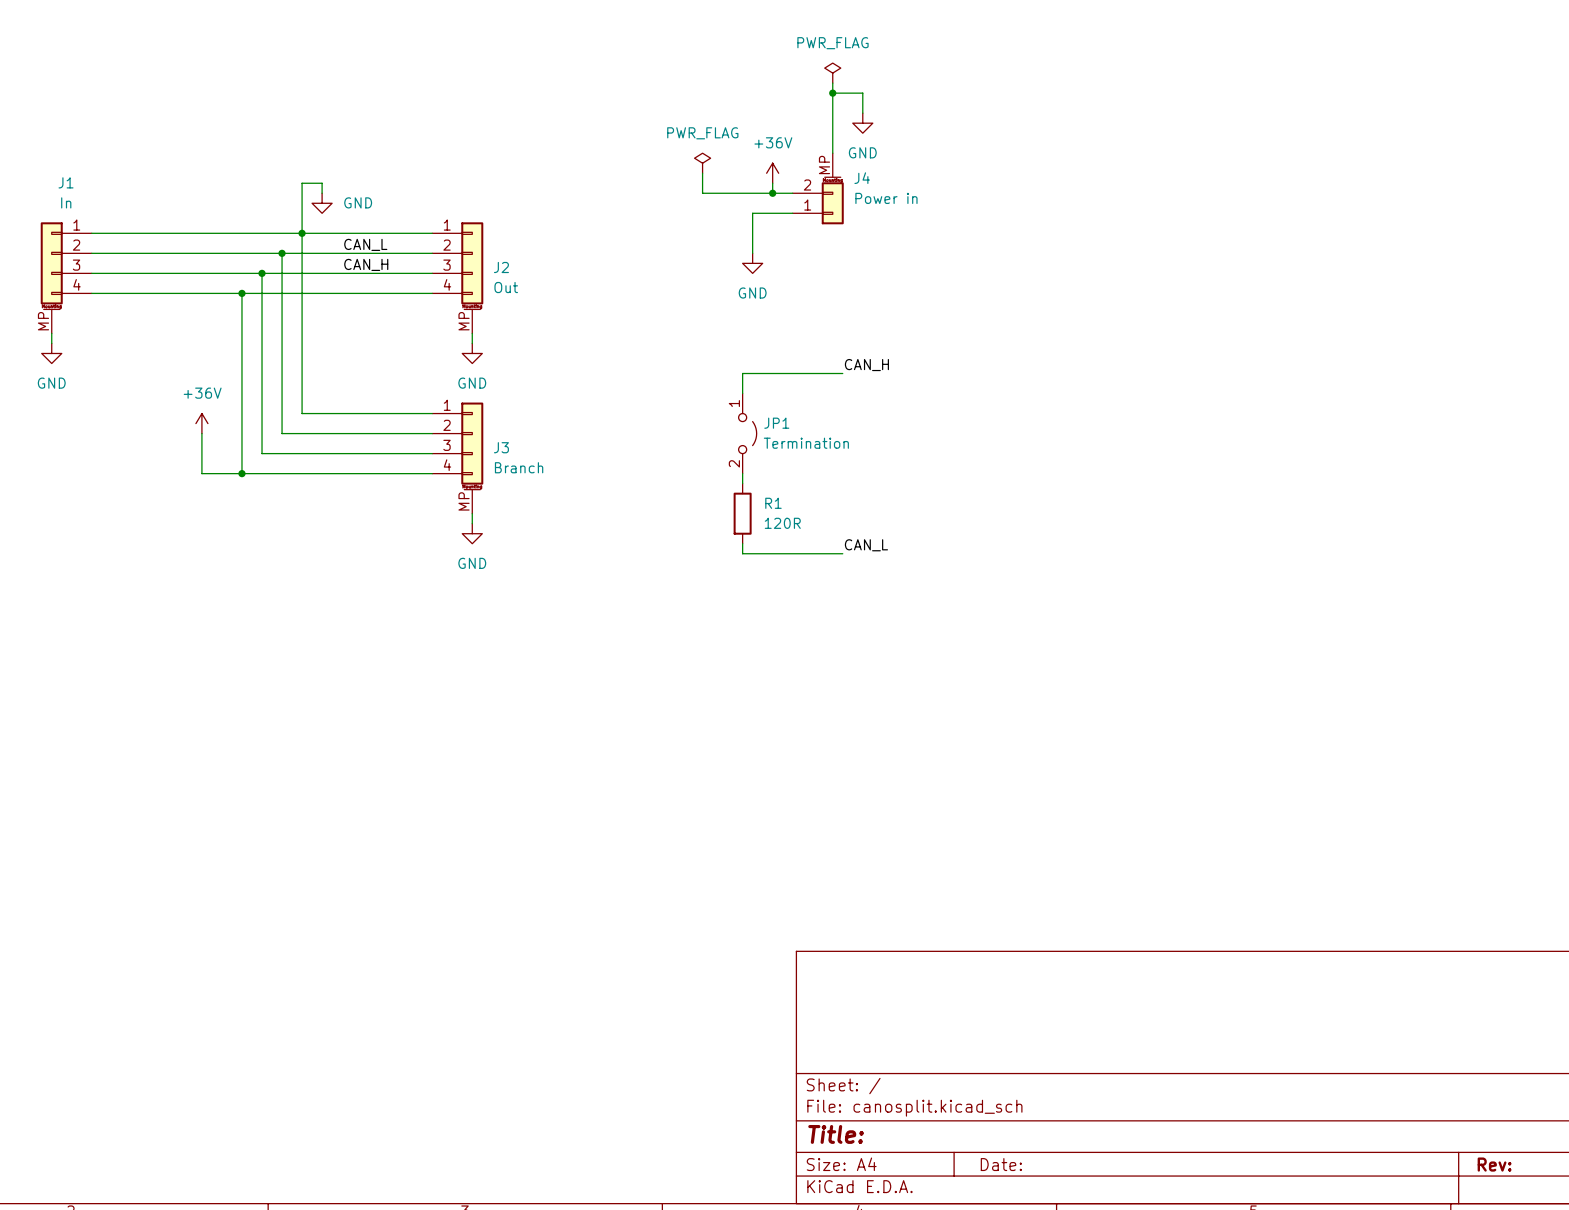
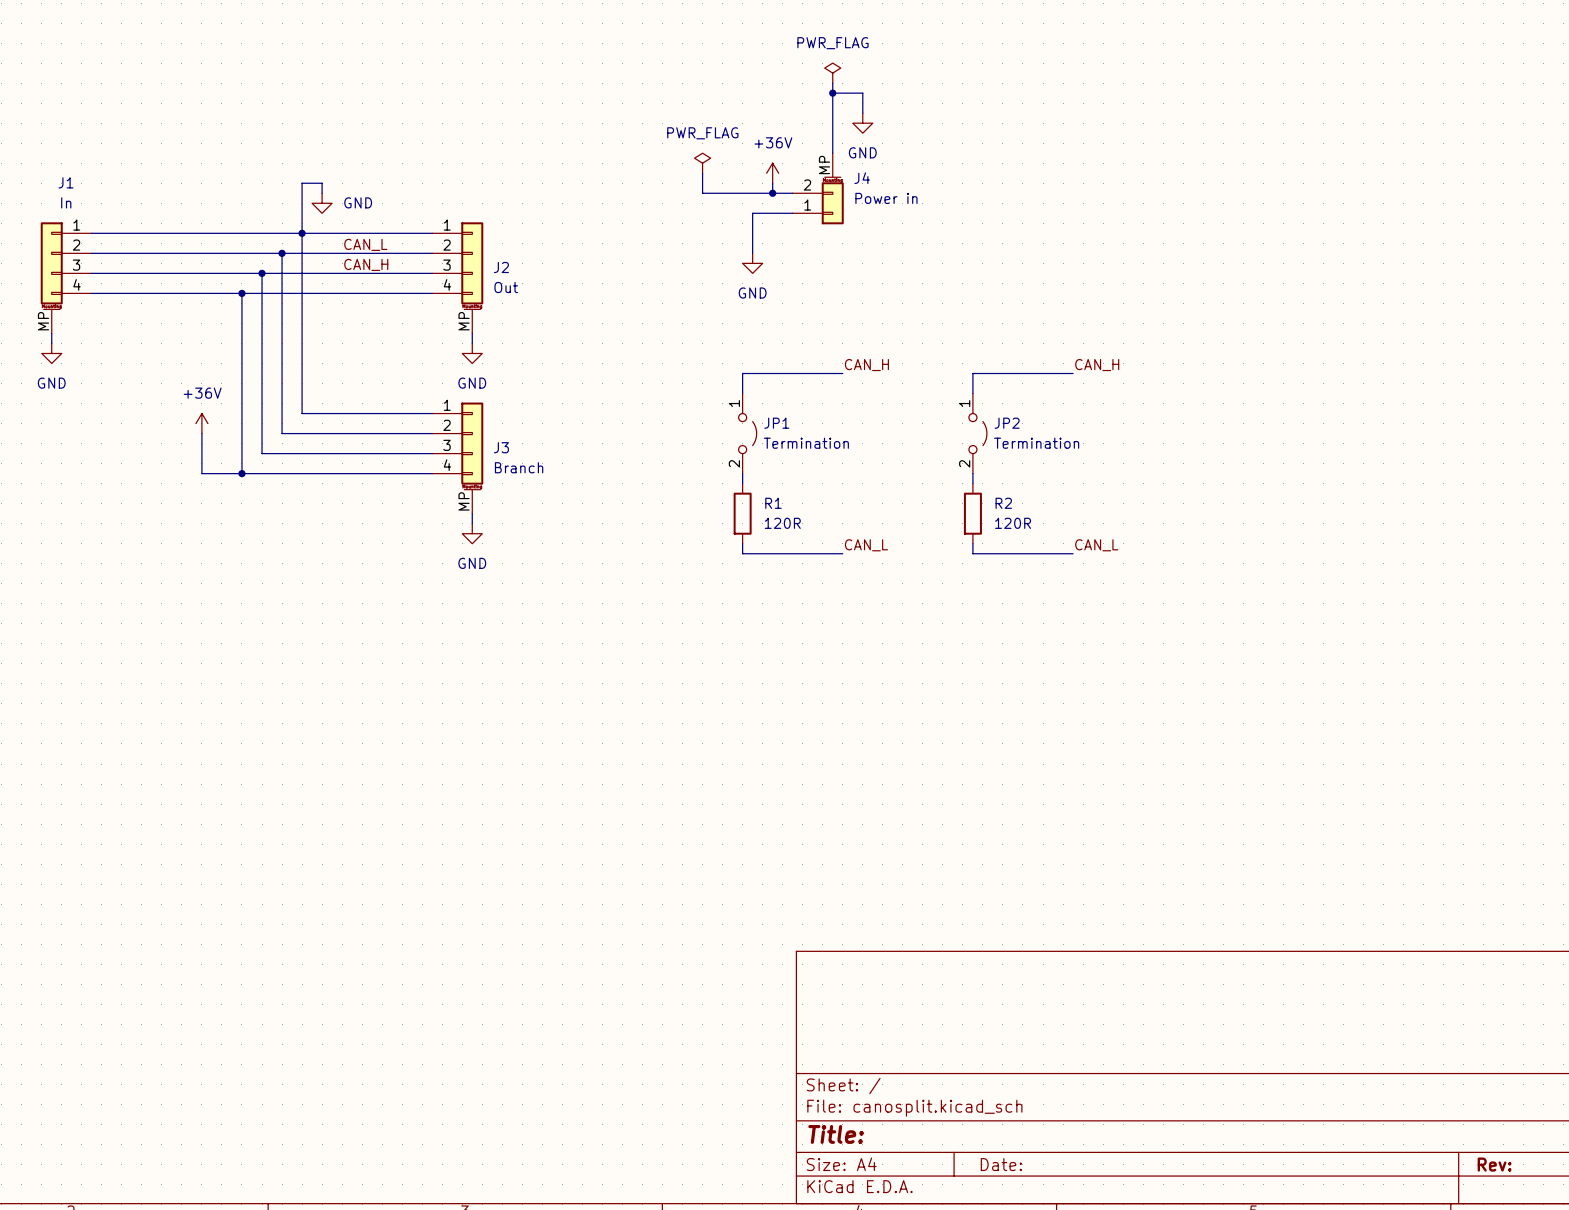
label: none -> CAN_H (1097, 365)
wire: none -> (1073, 373) (972, 373) (972, 393)
JP2: none -> Termination (977, 433)
wire: none -> (972, 473) (972, 483)
R2: none -> 120R (972, 513)
wire: none -> (972, 543) (972, 553) (1073, 553)
label: none -> CAN_L (1096, 545)

